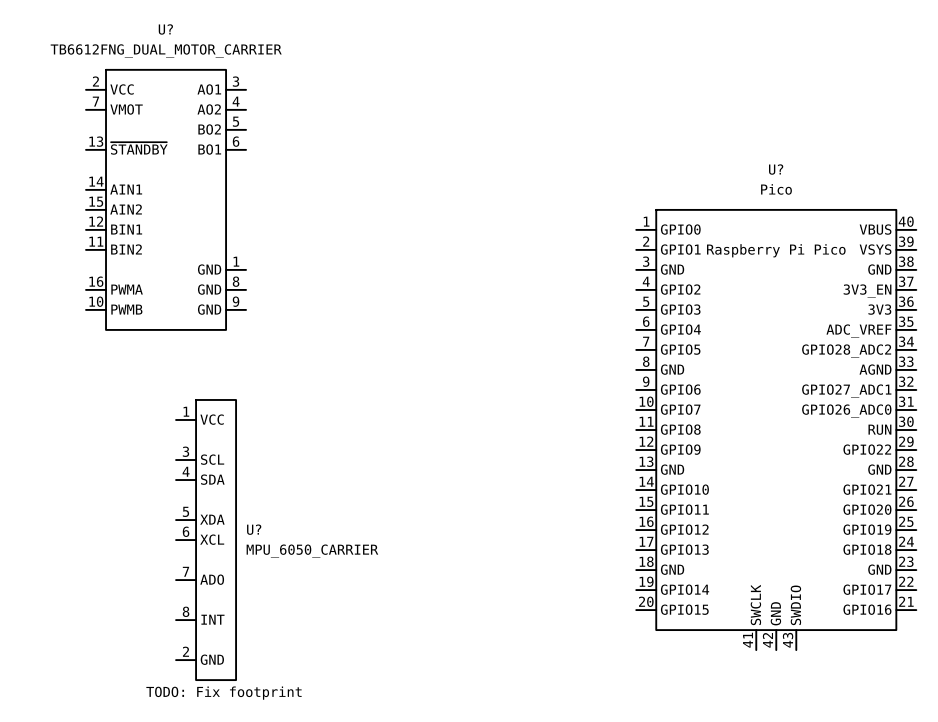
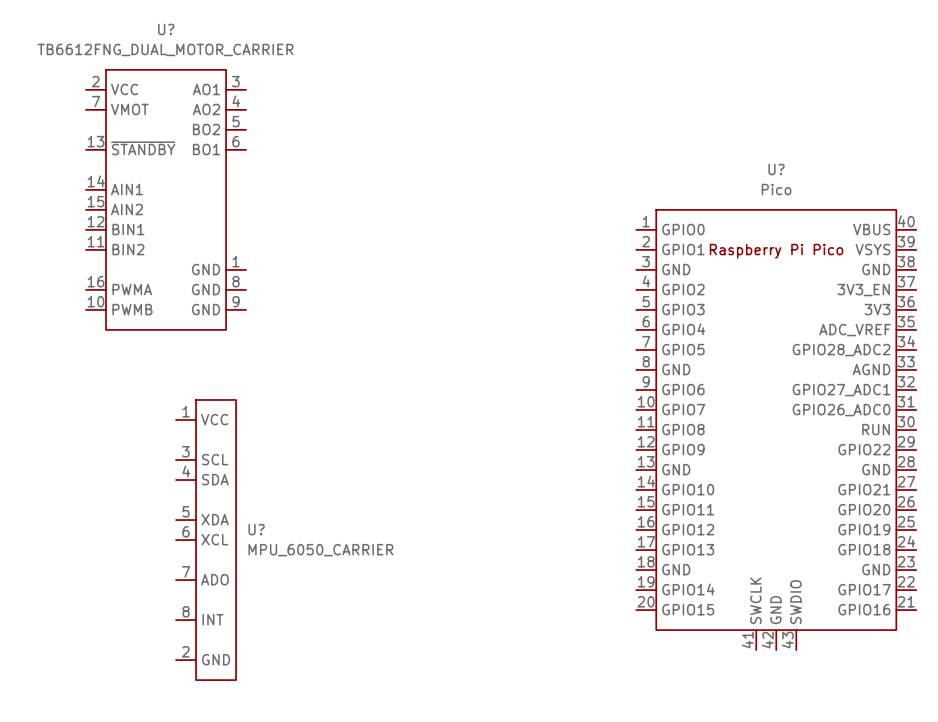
text: TODO: Fix footprint (223, 693) -> none

